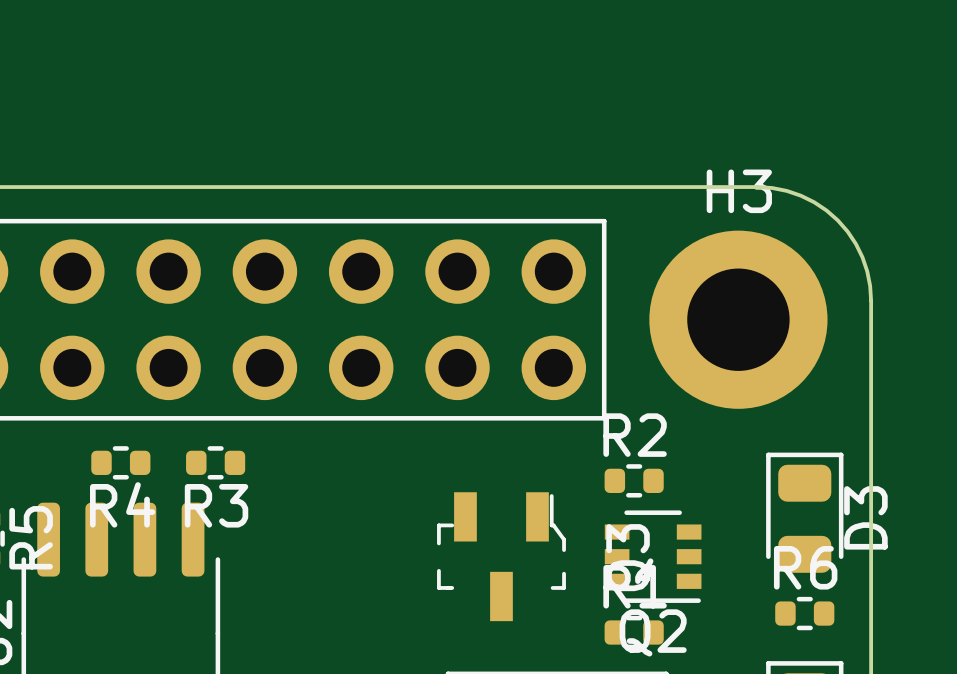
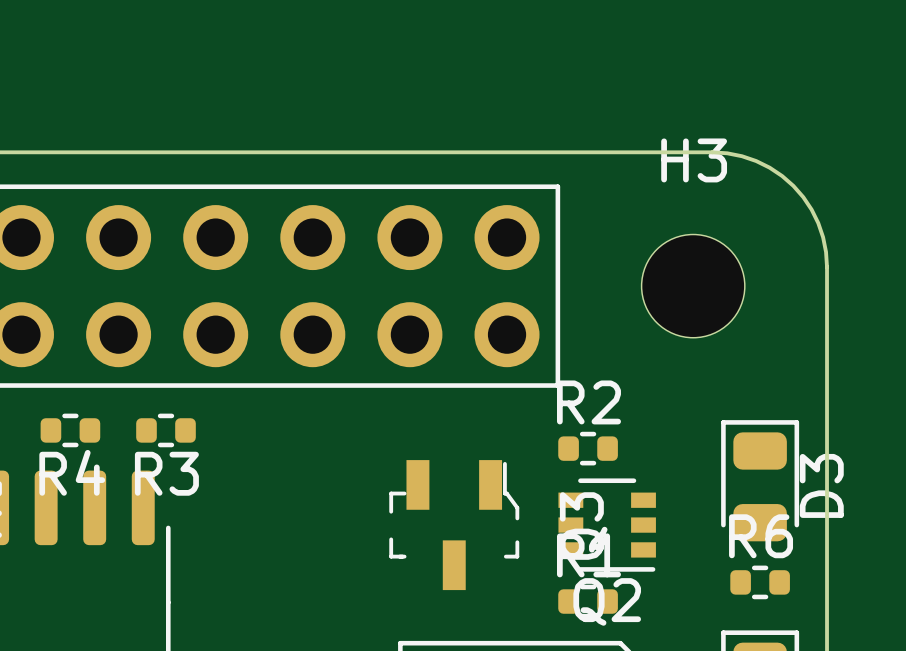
H3 footprint: [649, 230, 828, 409] -> [641, 234, 745, 338]

